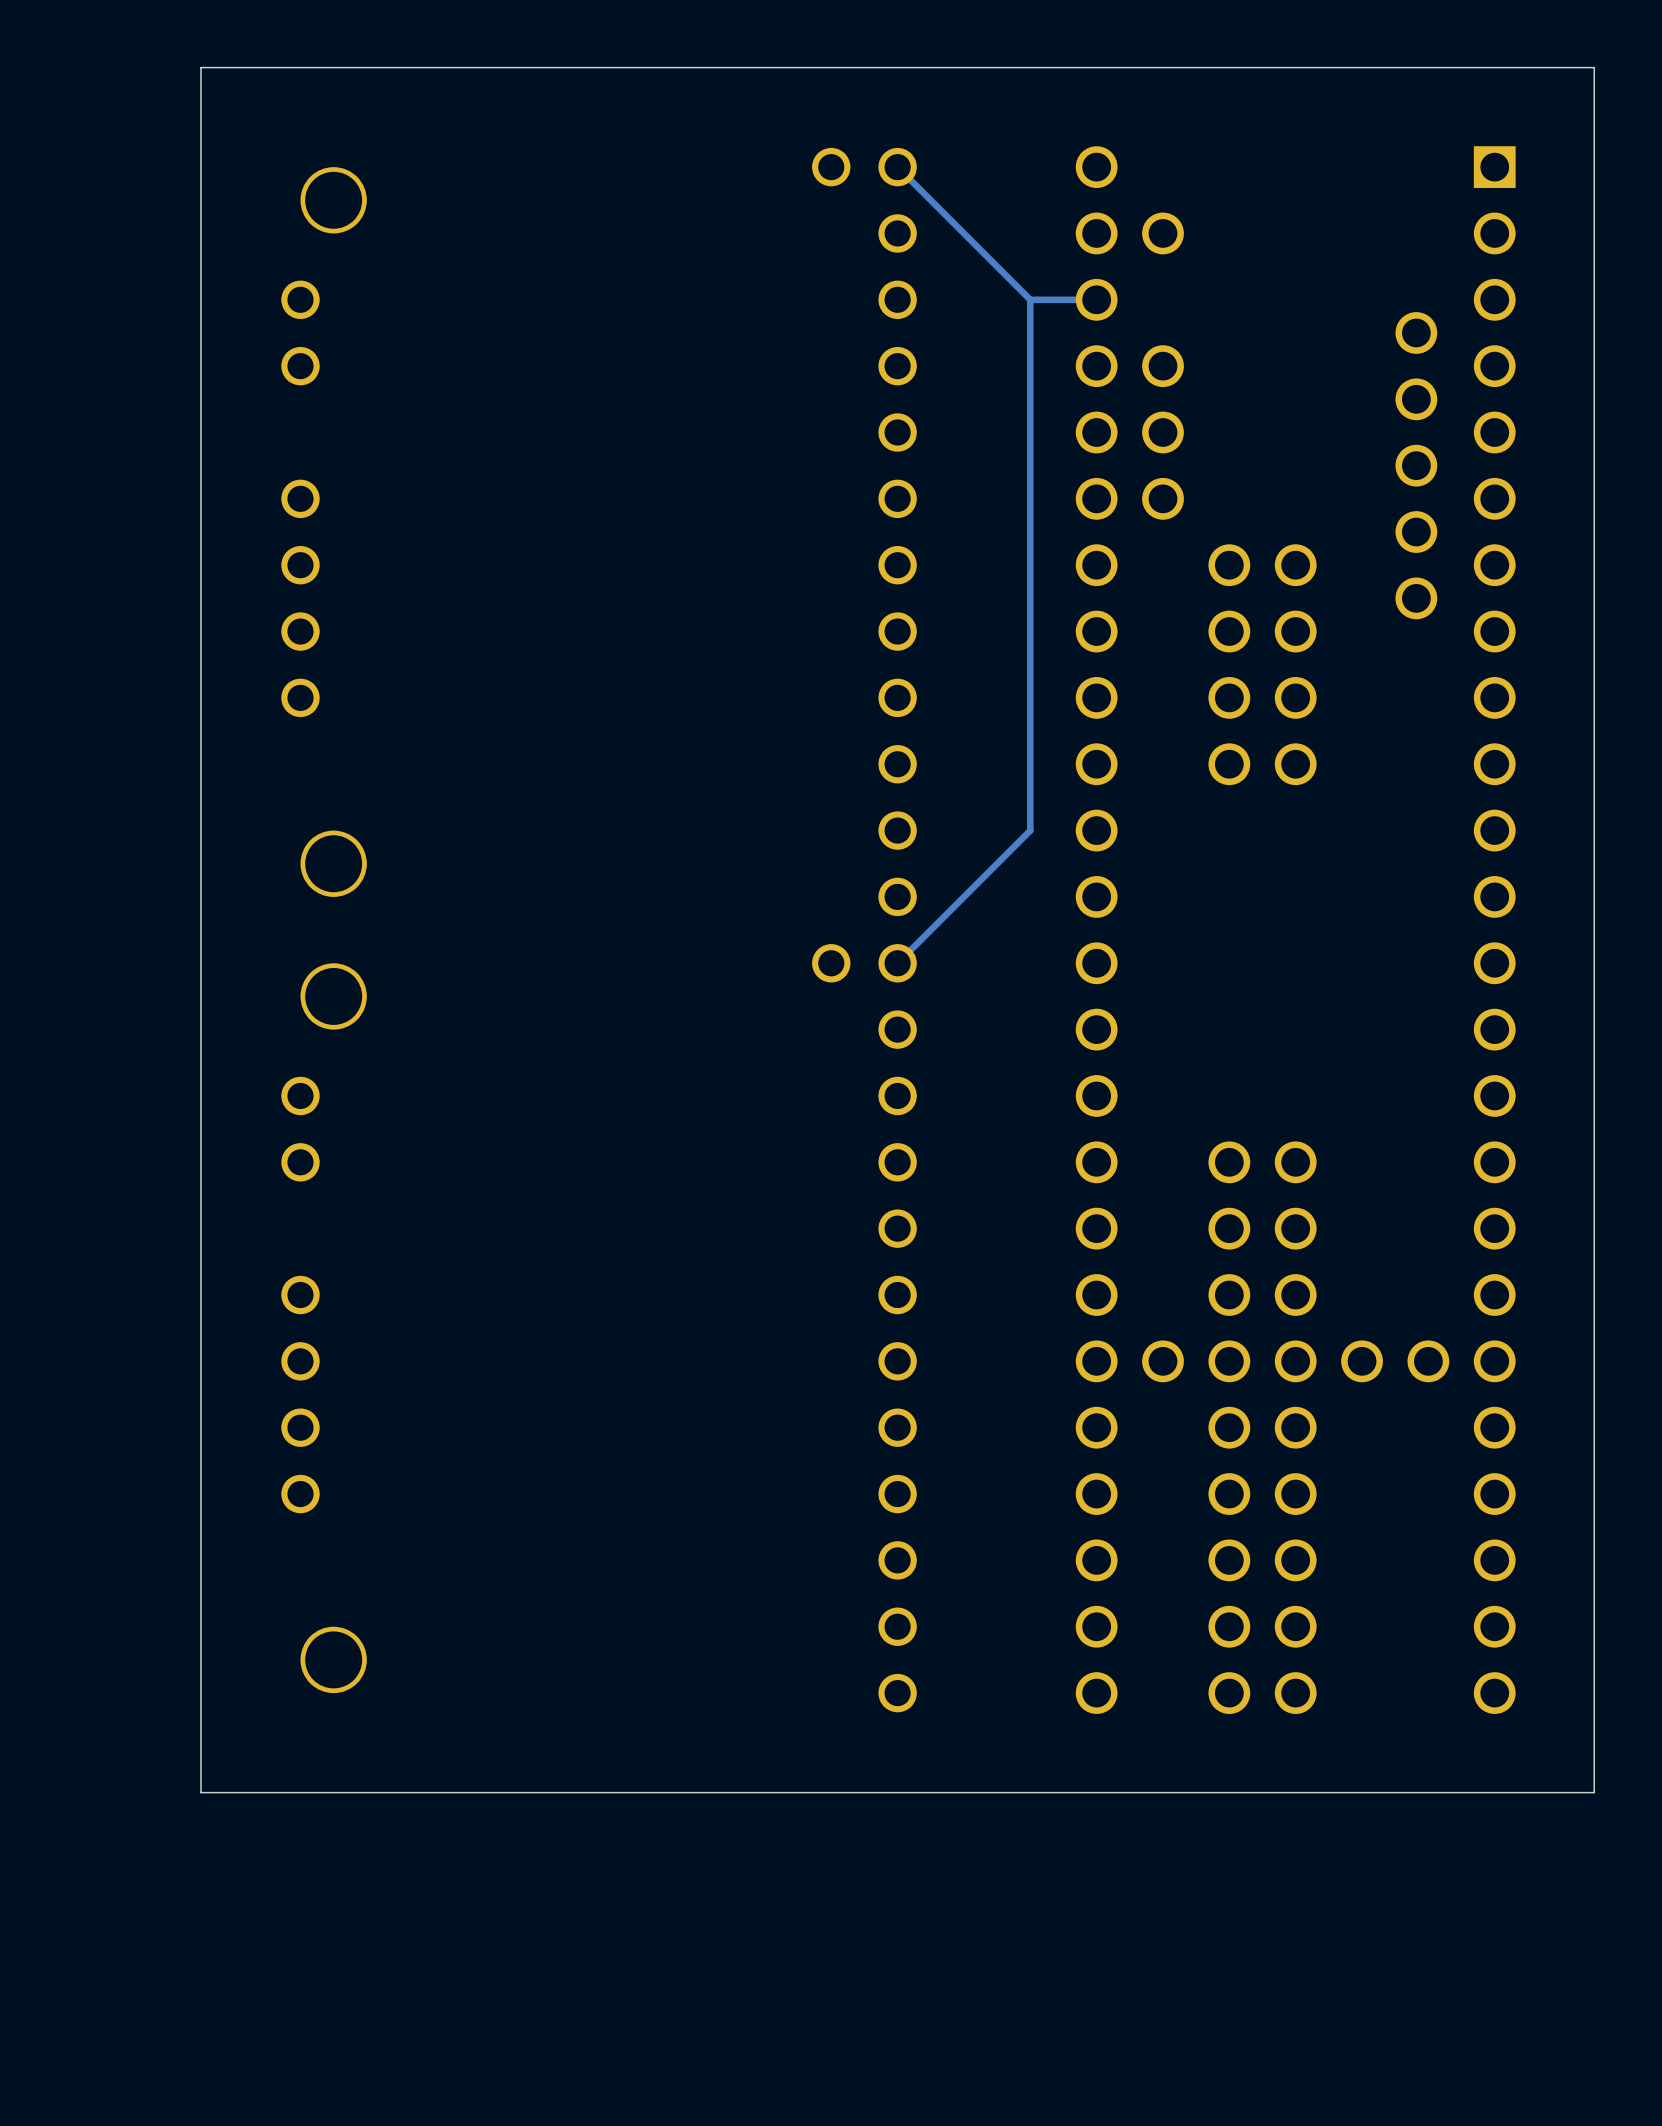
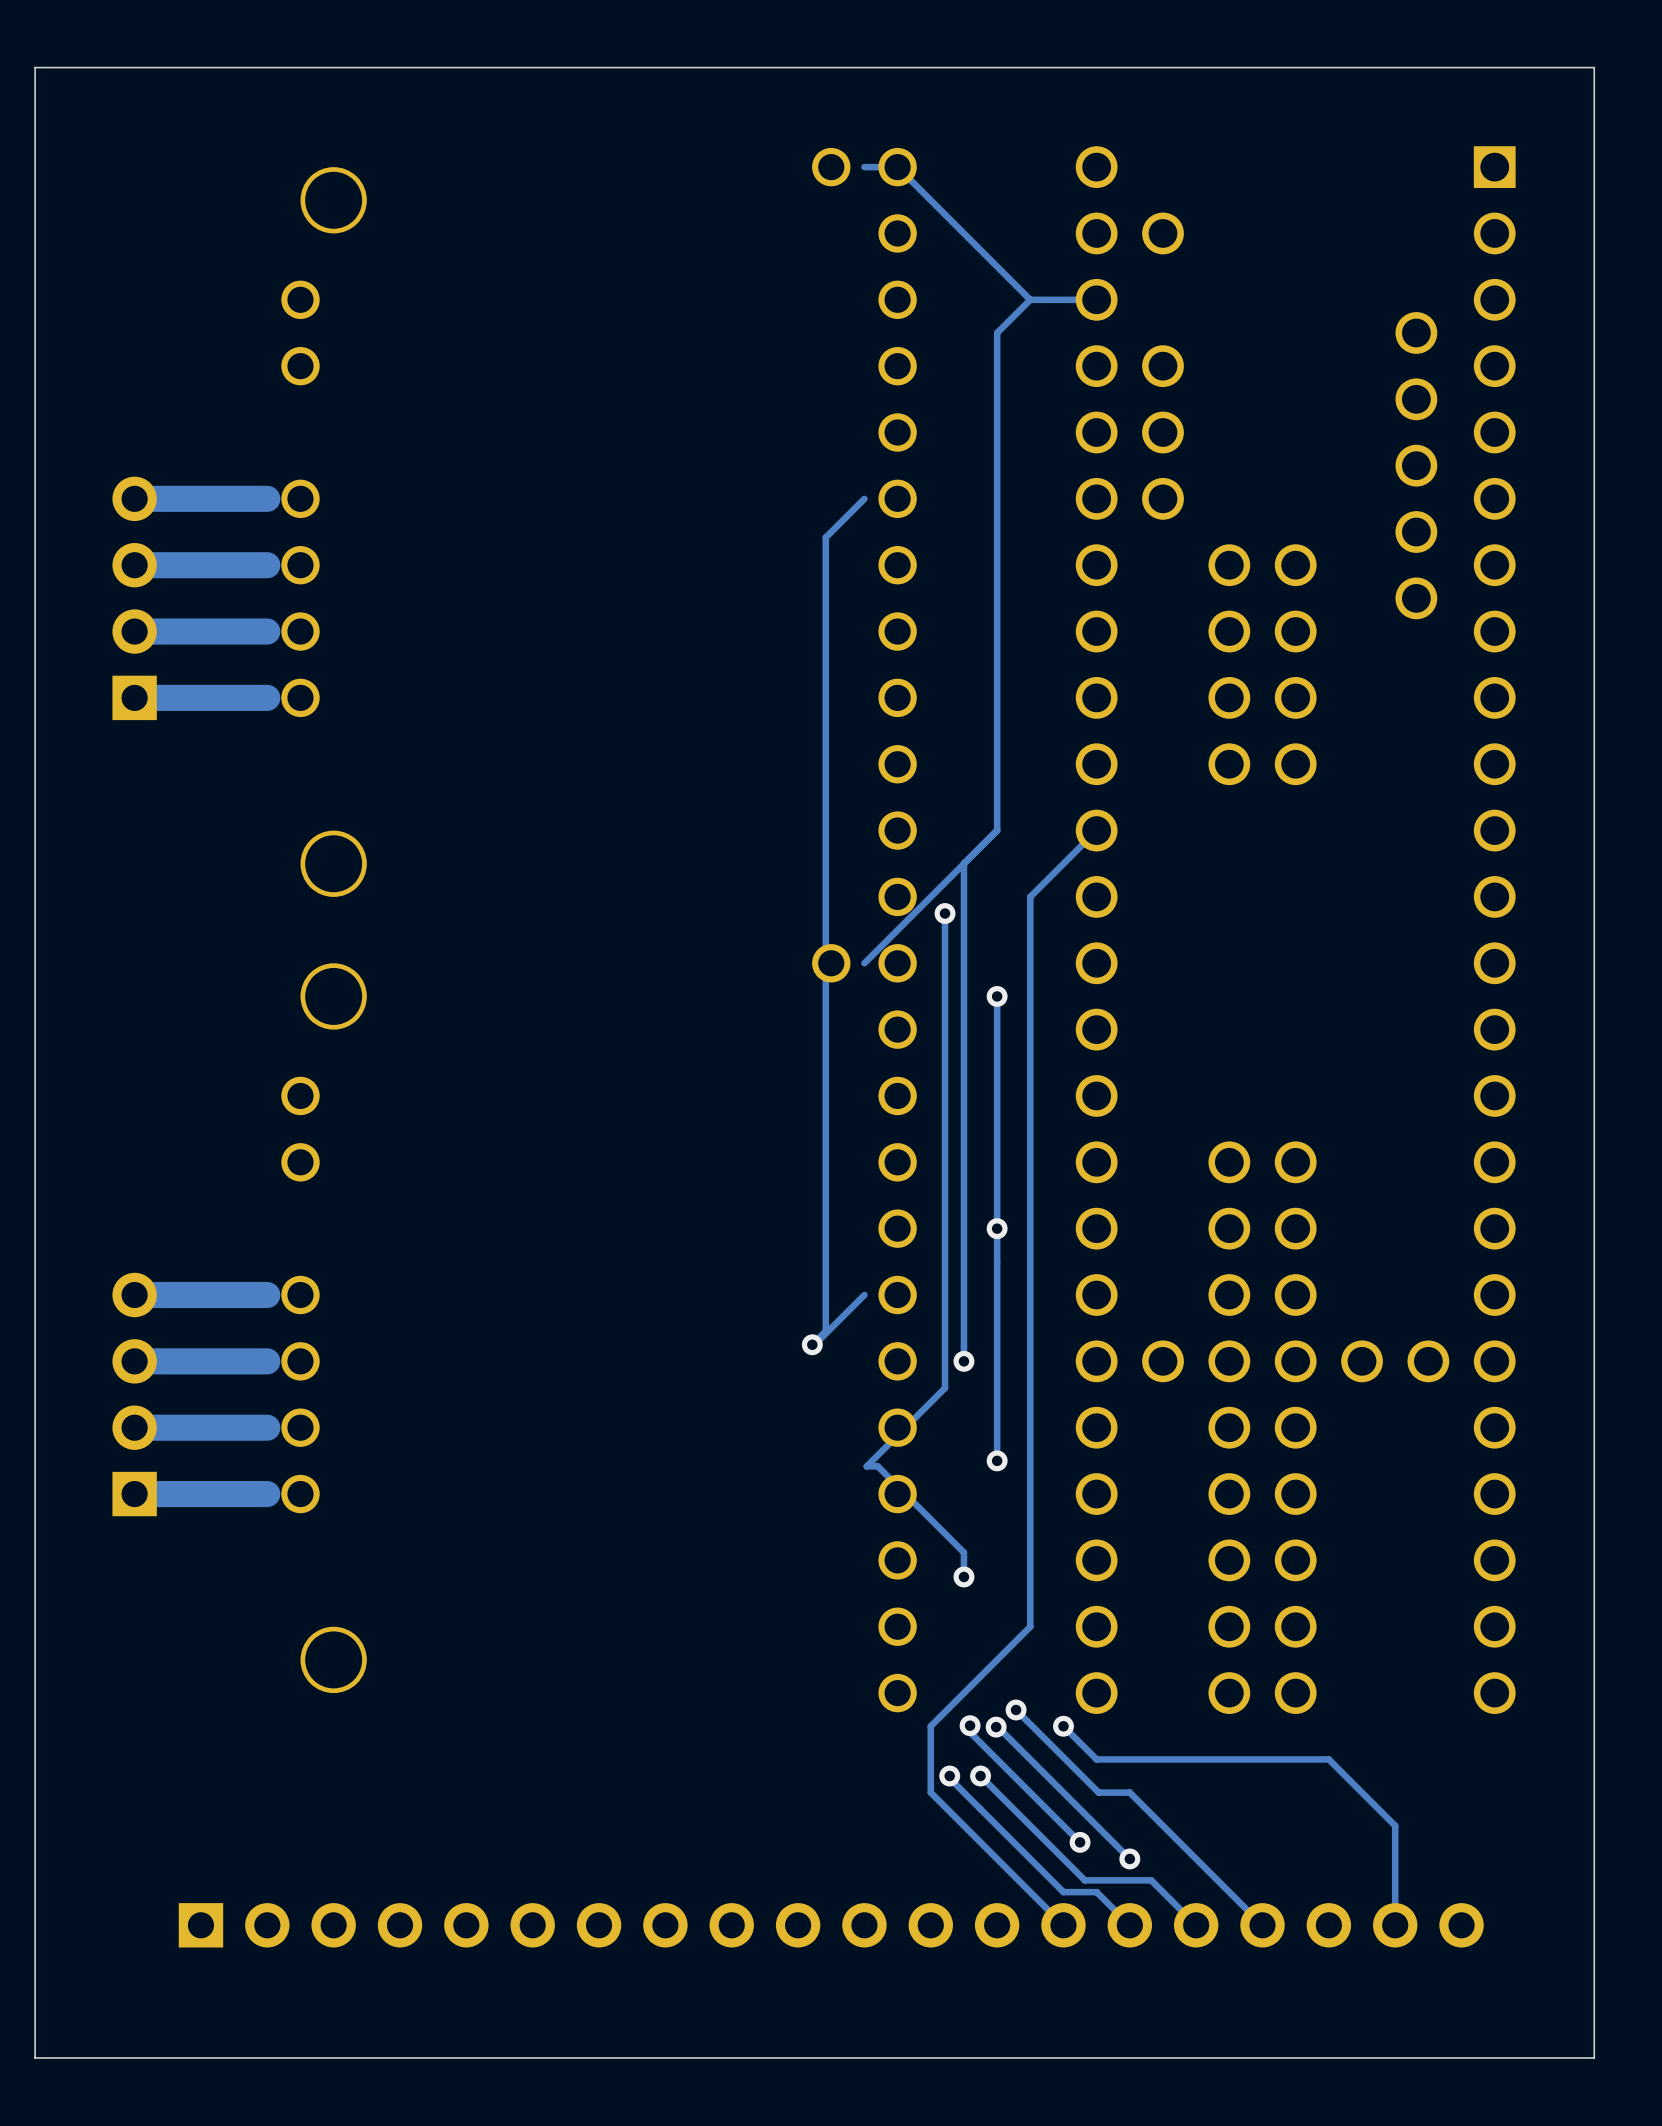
board edge: (200, 67) (200, 1792) (1594, 1792) -> (200, 67) (35, 67) (35, 2057) (1594, 2057) (1594, 1792)
track: none -> (897, 167) (864, 167)
track: (1030, 299) (1030, 830) (897, 963) -> (1030, 299) (997, 332) (997, 830) (864, 963)
track: none -> (267, 498) (134, 498)
track: none -> (864, 498) (825, 537) (825, 1331) (812, 1344) (814, 1344) (864, 1295)
track: none -> (267, 565) (134, 565)
part: none -> (134, 598)
track: none -> (267, 631) (134, 631)
track: none -> (267, 697) (134, 697)
track: none -> (1096, 830) (1030, 896) (1030, 1626) (930, 1726) (930, 1792) (1063, 1925)
track: none -> (963, 863) (963, 1361)
track: none -> (945, 913) (945, 1388) (866, 1466) (877, 1466) (963, 1552) (963, 1576)
via: none -> (945, 913)
track: none -> (997, 996) (997, 1460)
via: none -> (997, 996)
via: none -> (997, 1228)
track: none -> (267, 1295) (134, 1295)
via: none -> (812, 1344)
track: none -> (267, 1361) (134, 1361)
via: none -> (963, 1361)
part: none -> (134, 1394)
track: none -> (267, 1427) (134, 1427)
via: none -> (997, 1460)
track: none -> (267, 1494) (134, 1494)
via: none -> (963, 1576)
track: none -> (1016, 1709) (1098, 1792) (1129, 1792) (1262, 1925)
via: none -> (1016, 1709)
track: none -> (970, 1725) (970, 1732) (1080, 1842)
via: none -> (970, 1725)
track: none -> (1063, 1726) (1096, 1759) (1328, 1759) (1395, 1825) (1395, 1925)
via: none -> (1063, 1726)
track: none -> (996, 1727) (1129, 1858)
via: none -> (996, 1727)
track: none -> (949, 1776) (949, 1778) (1063, 1892) (1096, 1892) (1129, 1925)
via: none -> (949, 1776)
track: none -> (980, 1776) (1084, 1880) (1151, 1880) (1196, 1925)
via: none -> (980, 1776)
via: none -> (1080, 1842)
via: none -> (1129, 1858)
part: none -> (831, 1925)

